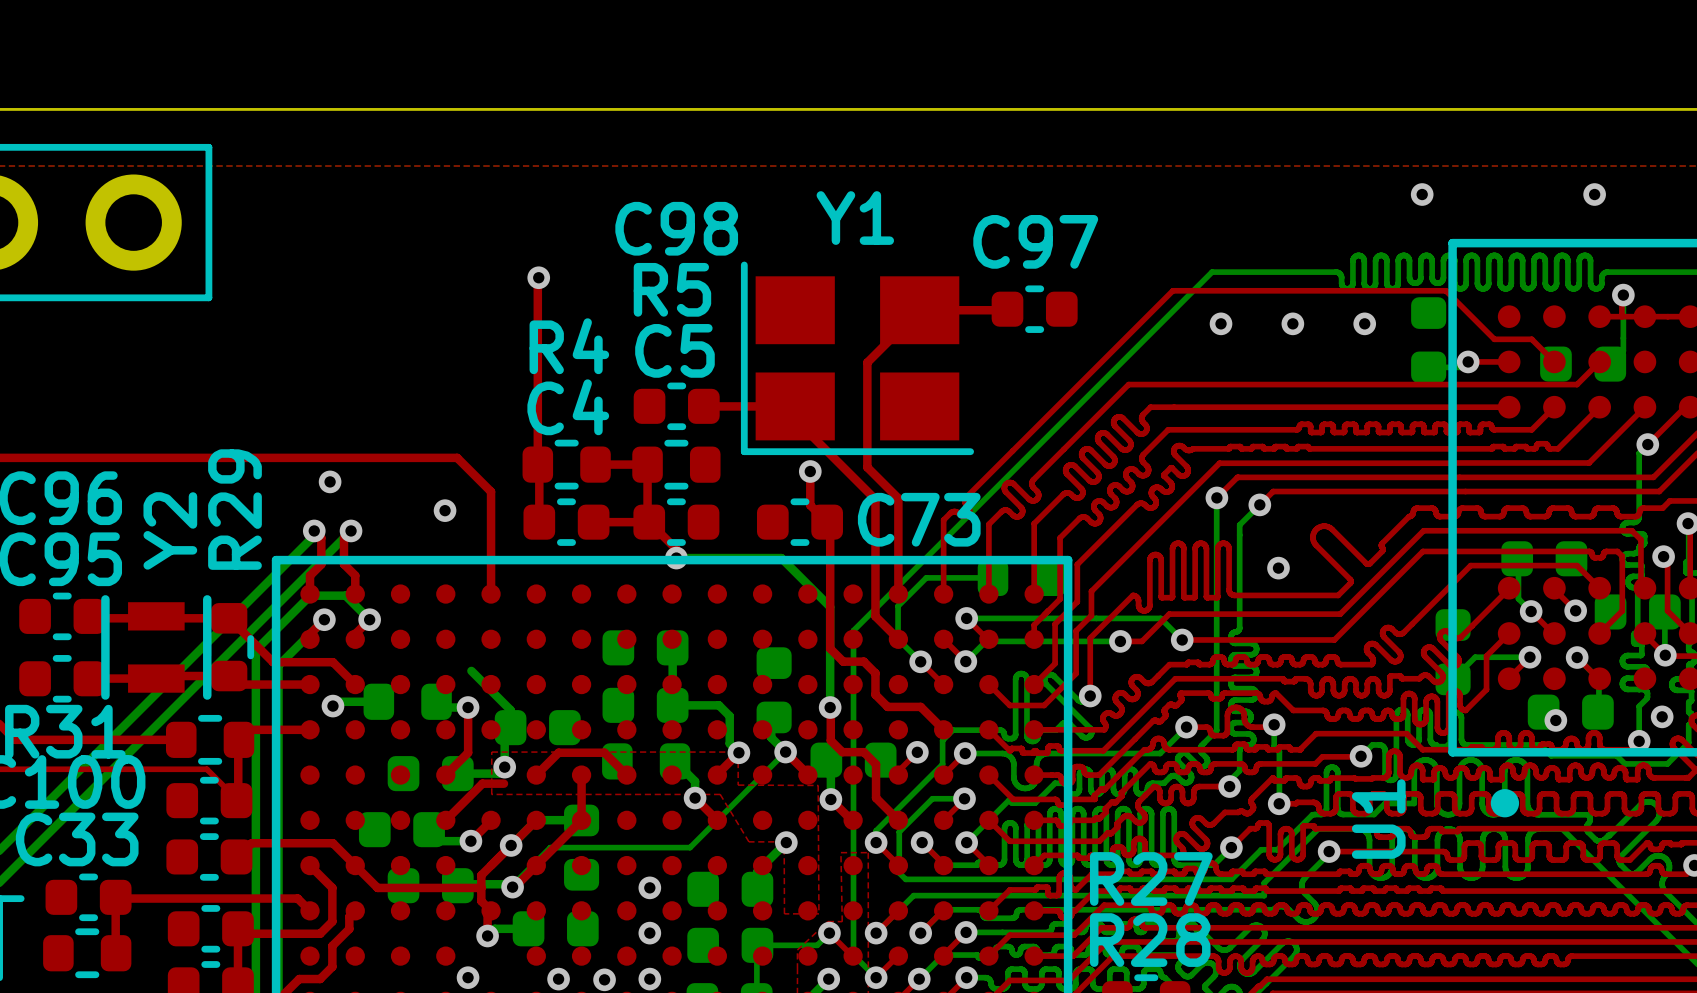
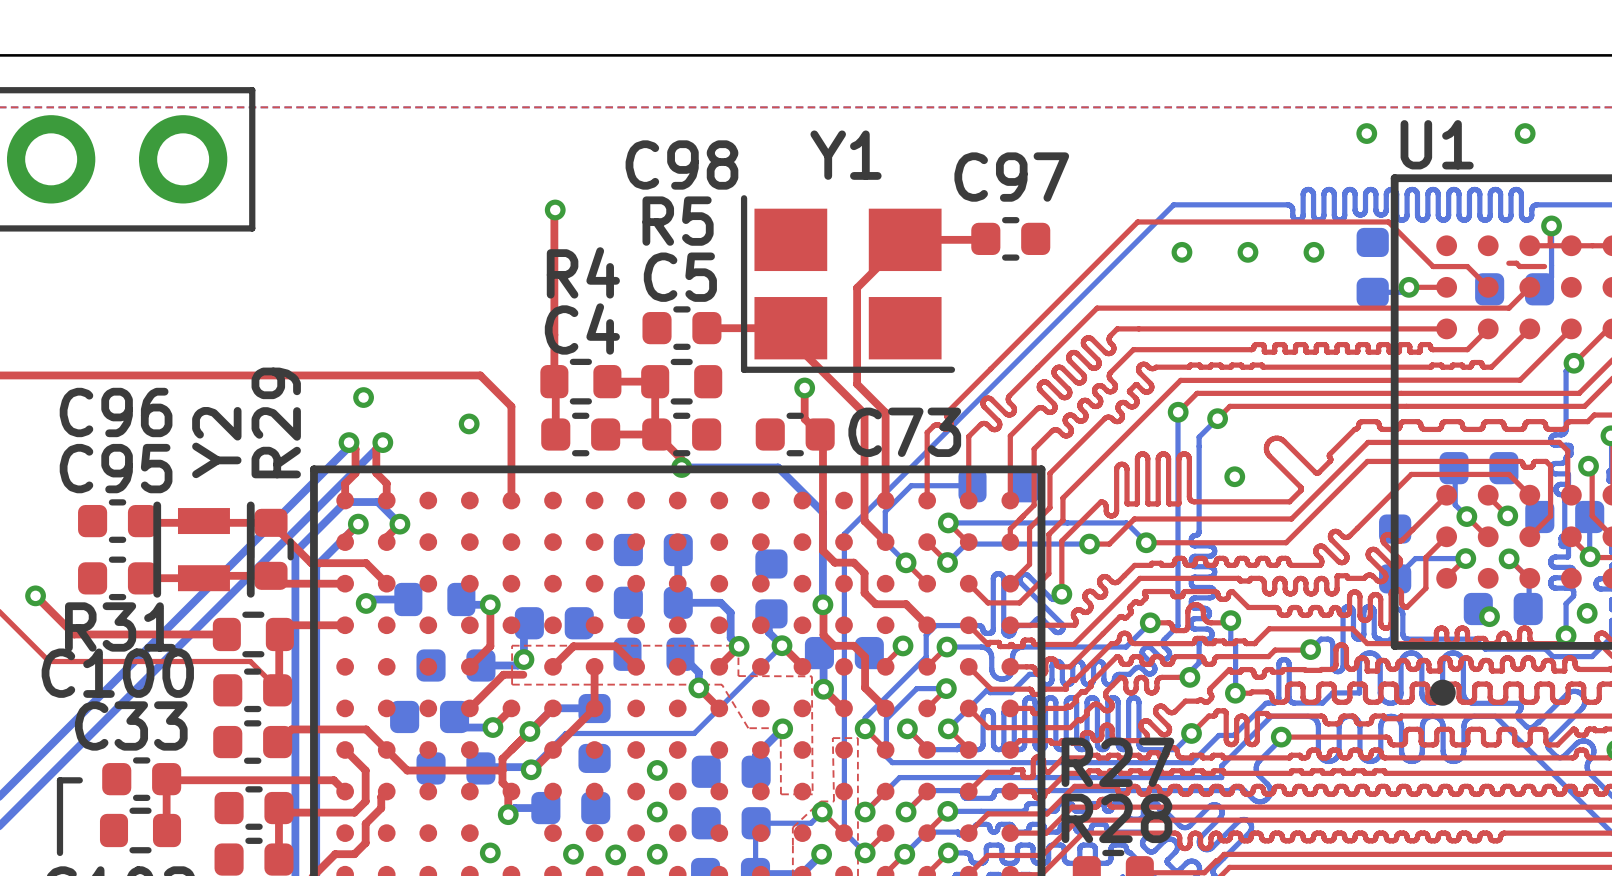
top track: none -> (1508, 263) (1516, 263) (1519, 266) (1544, 266)
bottom track: (471, 670) (510, 710) (510, 727) -> none
U1 name rotation: 0° (1378, 819) -> 90° clockwise (1437, 144)
U1 name position: U1 (1378, 819) -> U1 (1437, 144)

